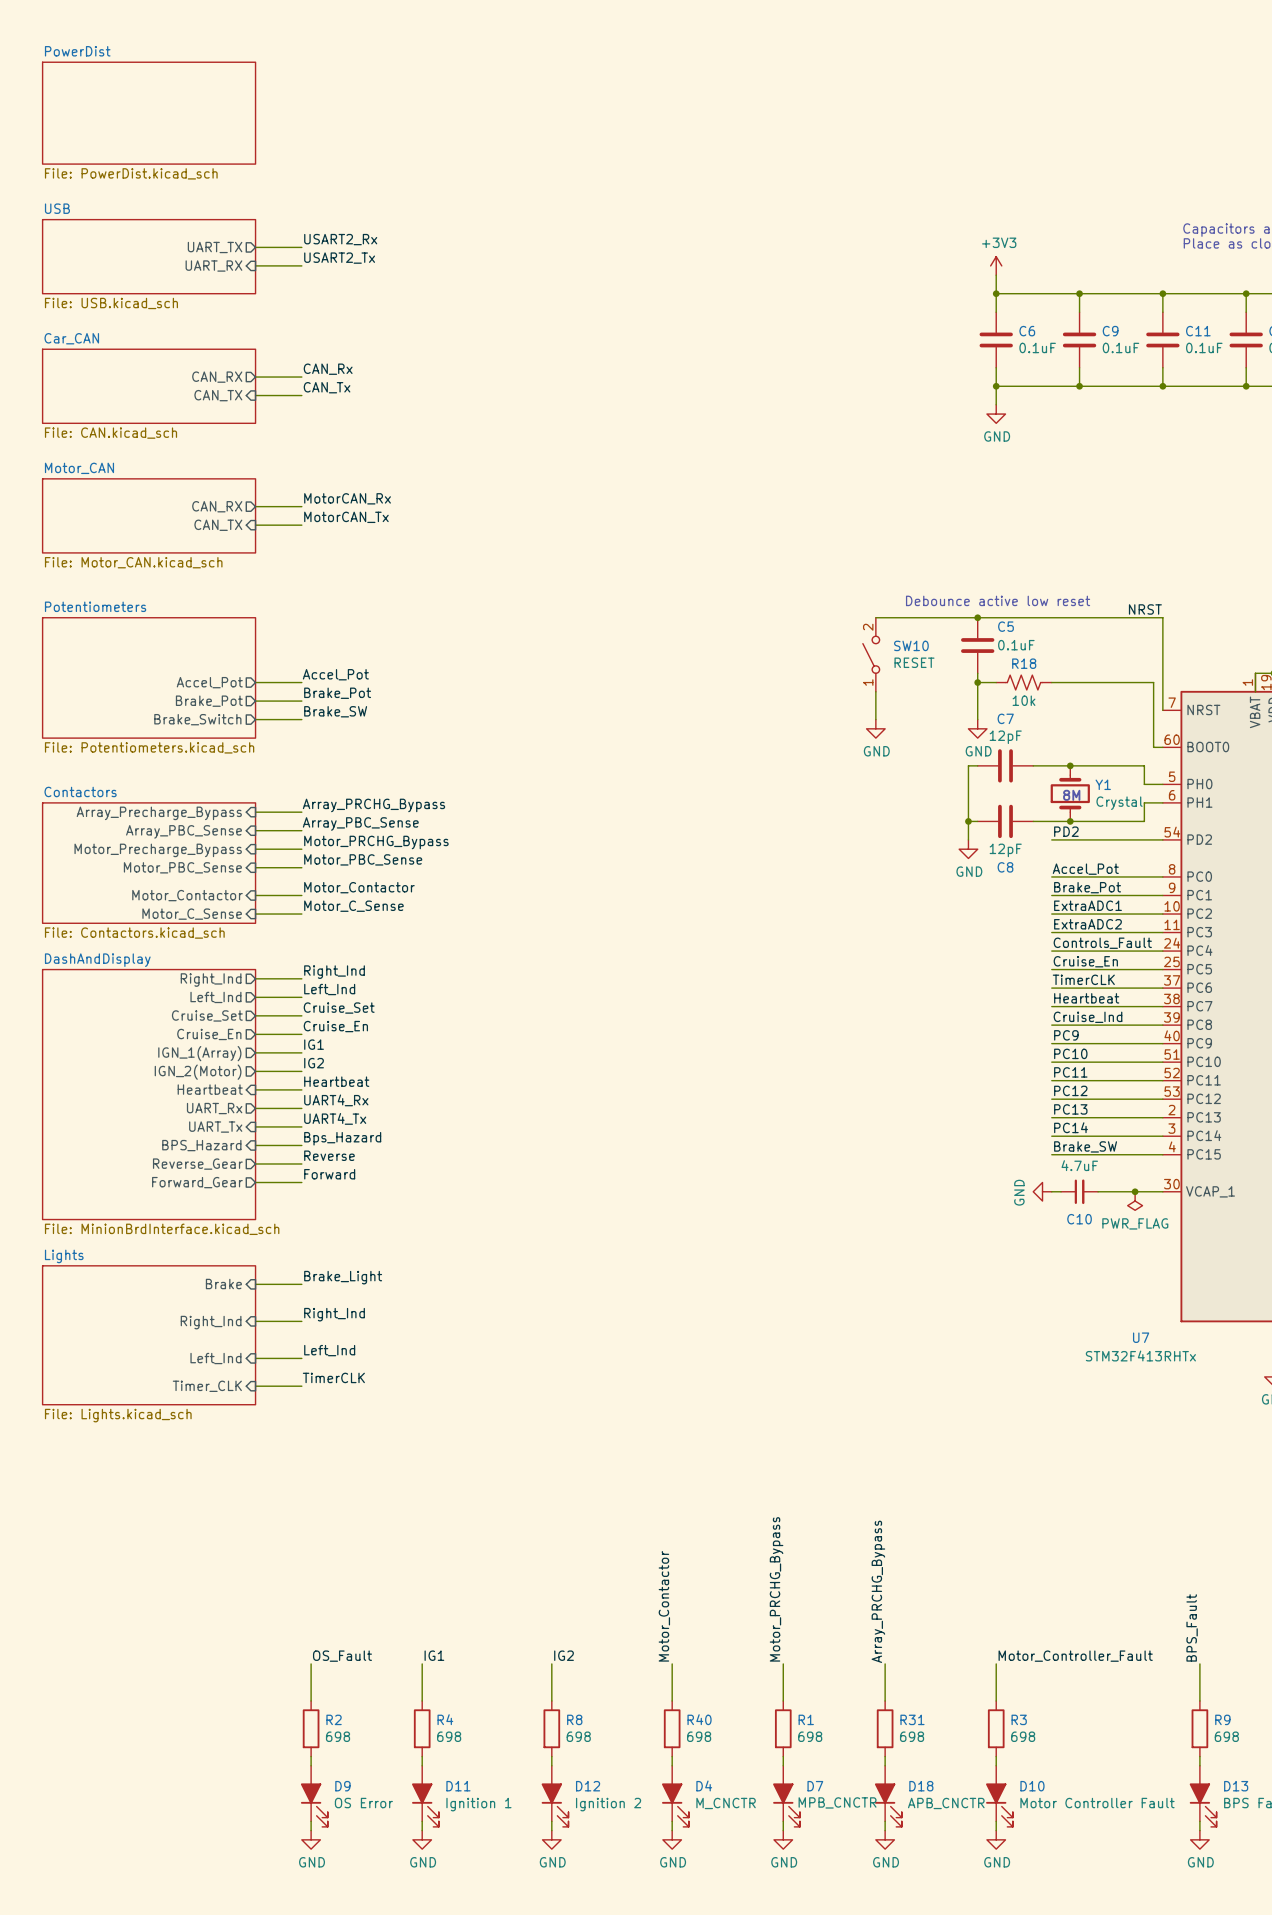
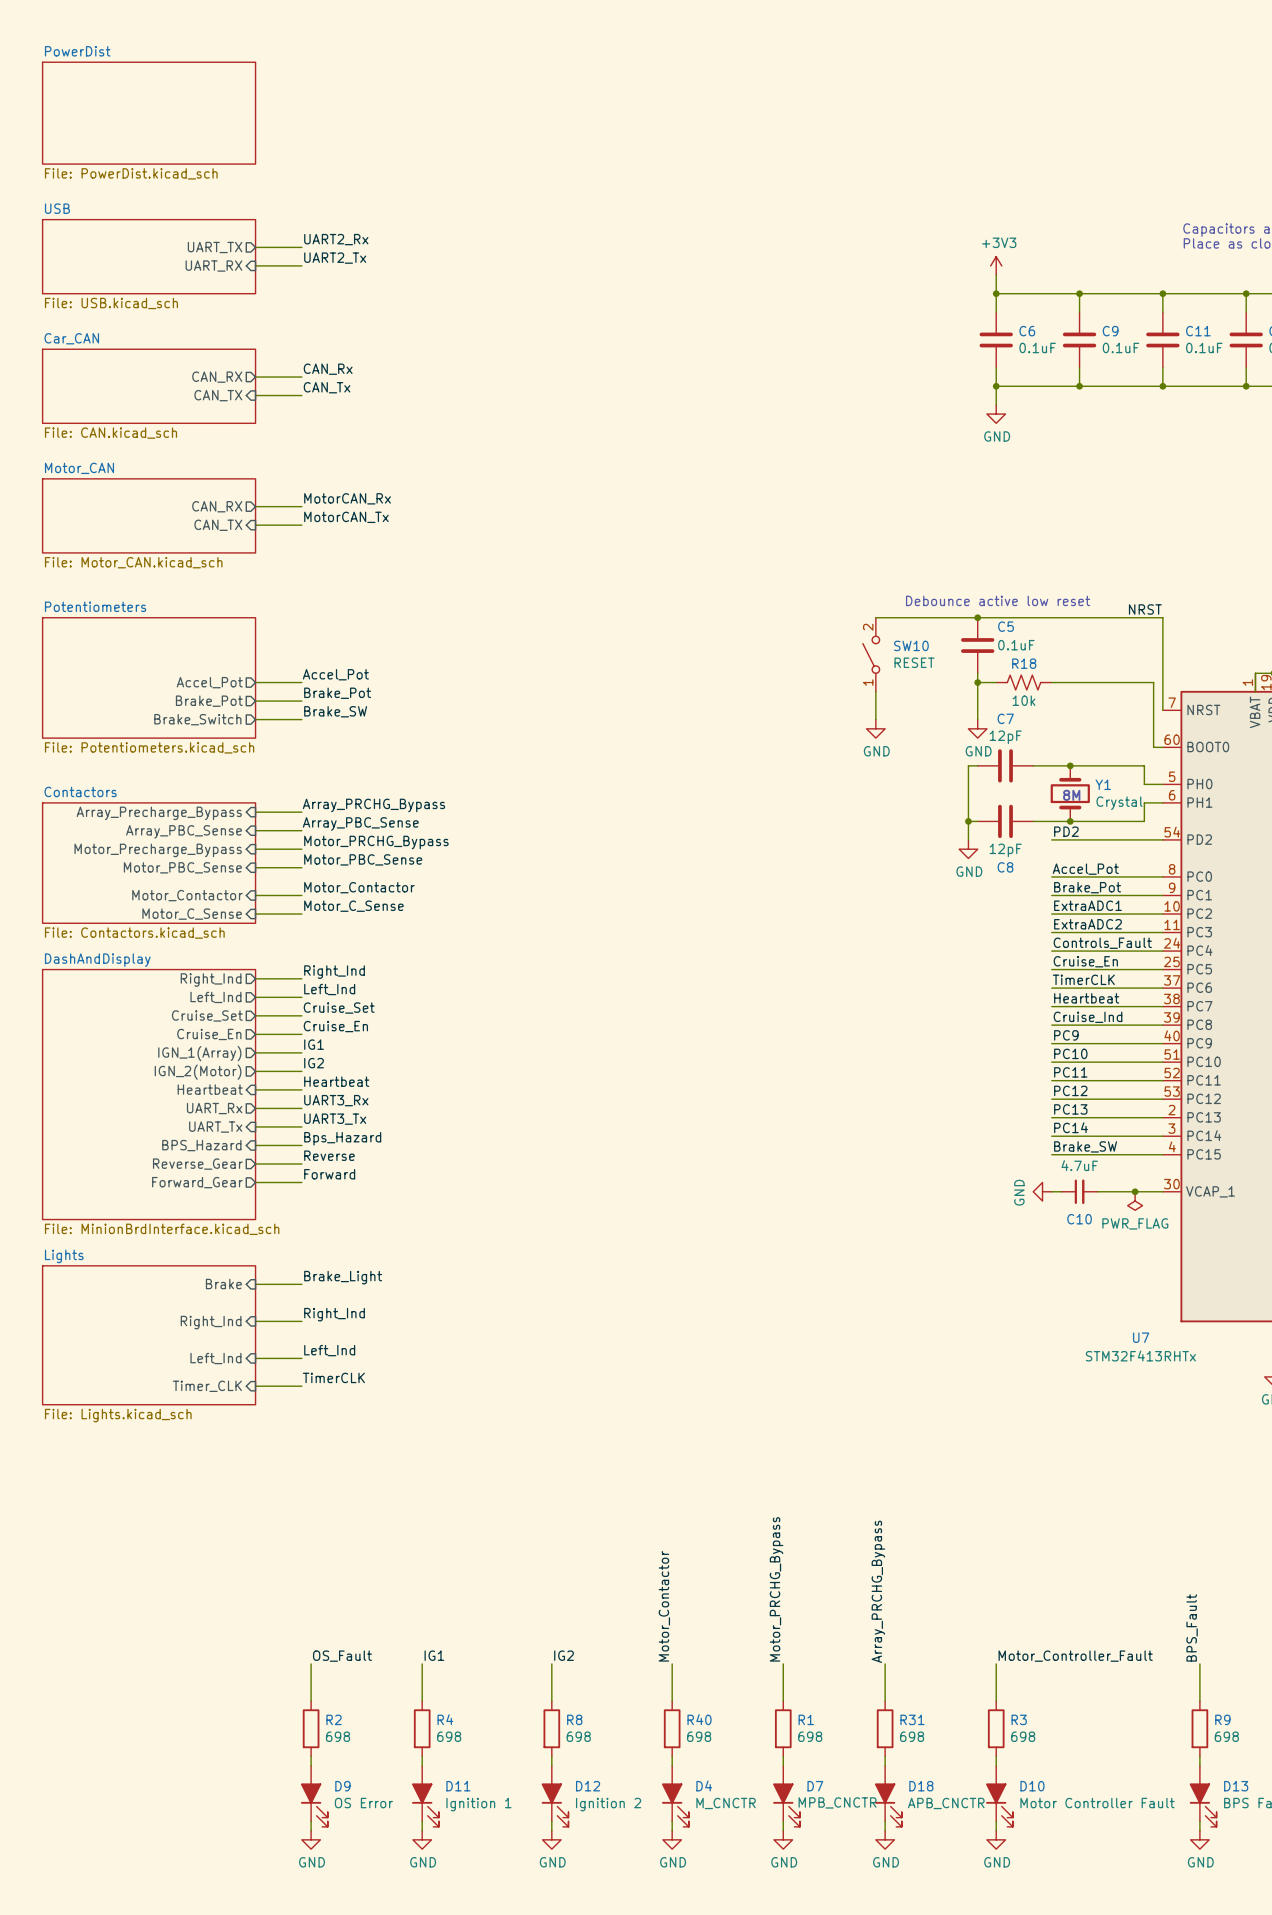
label: USART2_Rx (340, 239) -> UART2_Rx (336, 239)
label: USART2_Tx (339, 258) -> UART2_Tx (335, 258)
label: UART4_Rx (336, 1100) -> UART3_Rx (336, 1100)
label: UART4_Tx (335, 1118) -> UART3_Tx (335, 1119)

